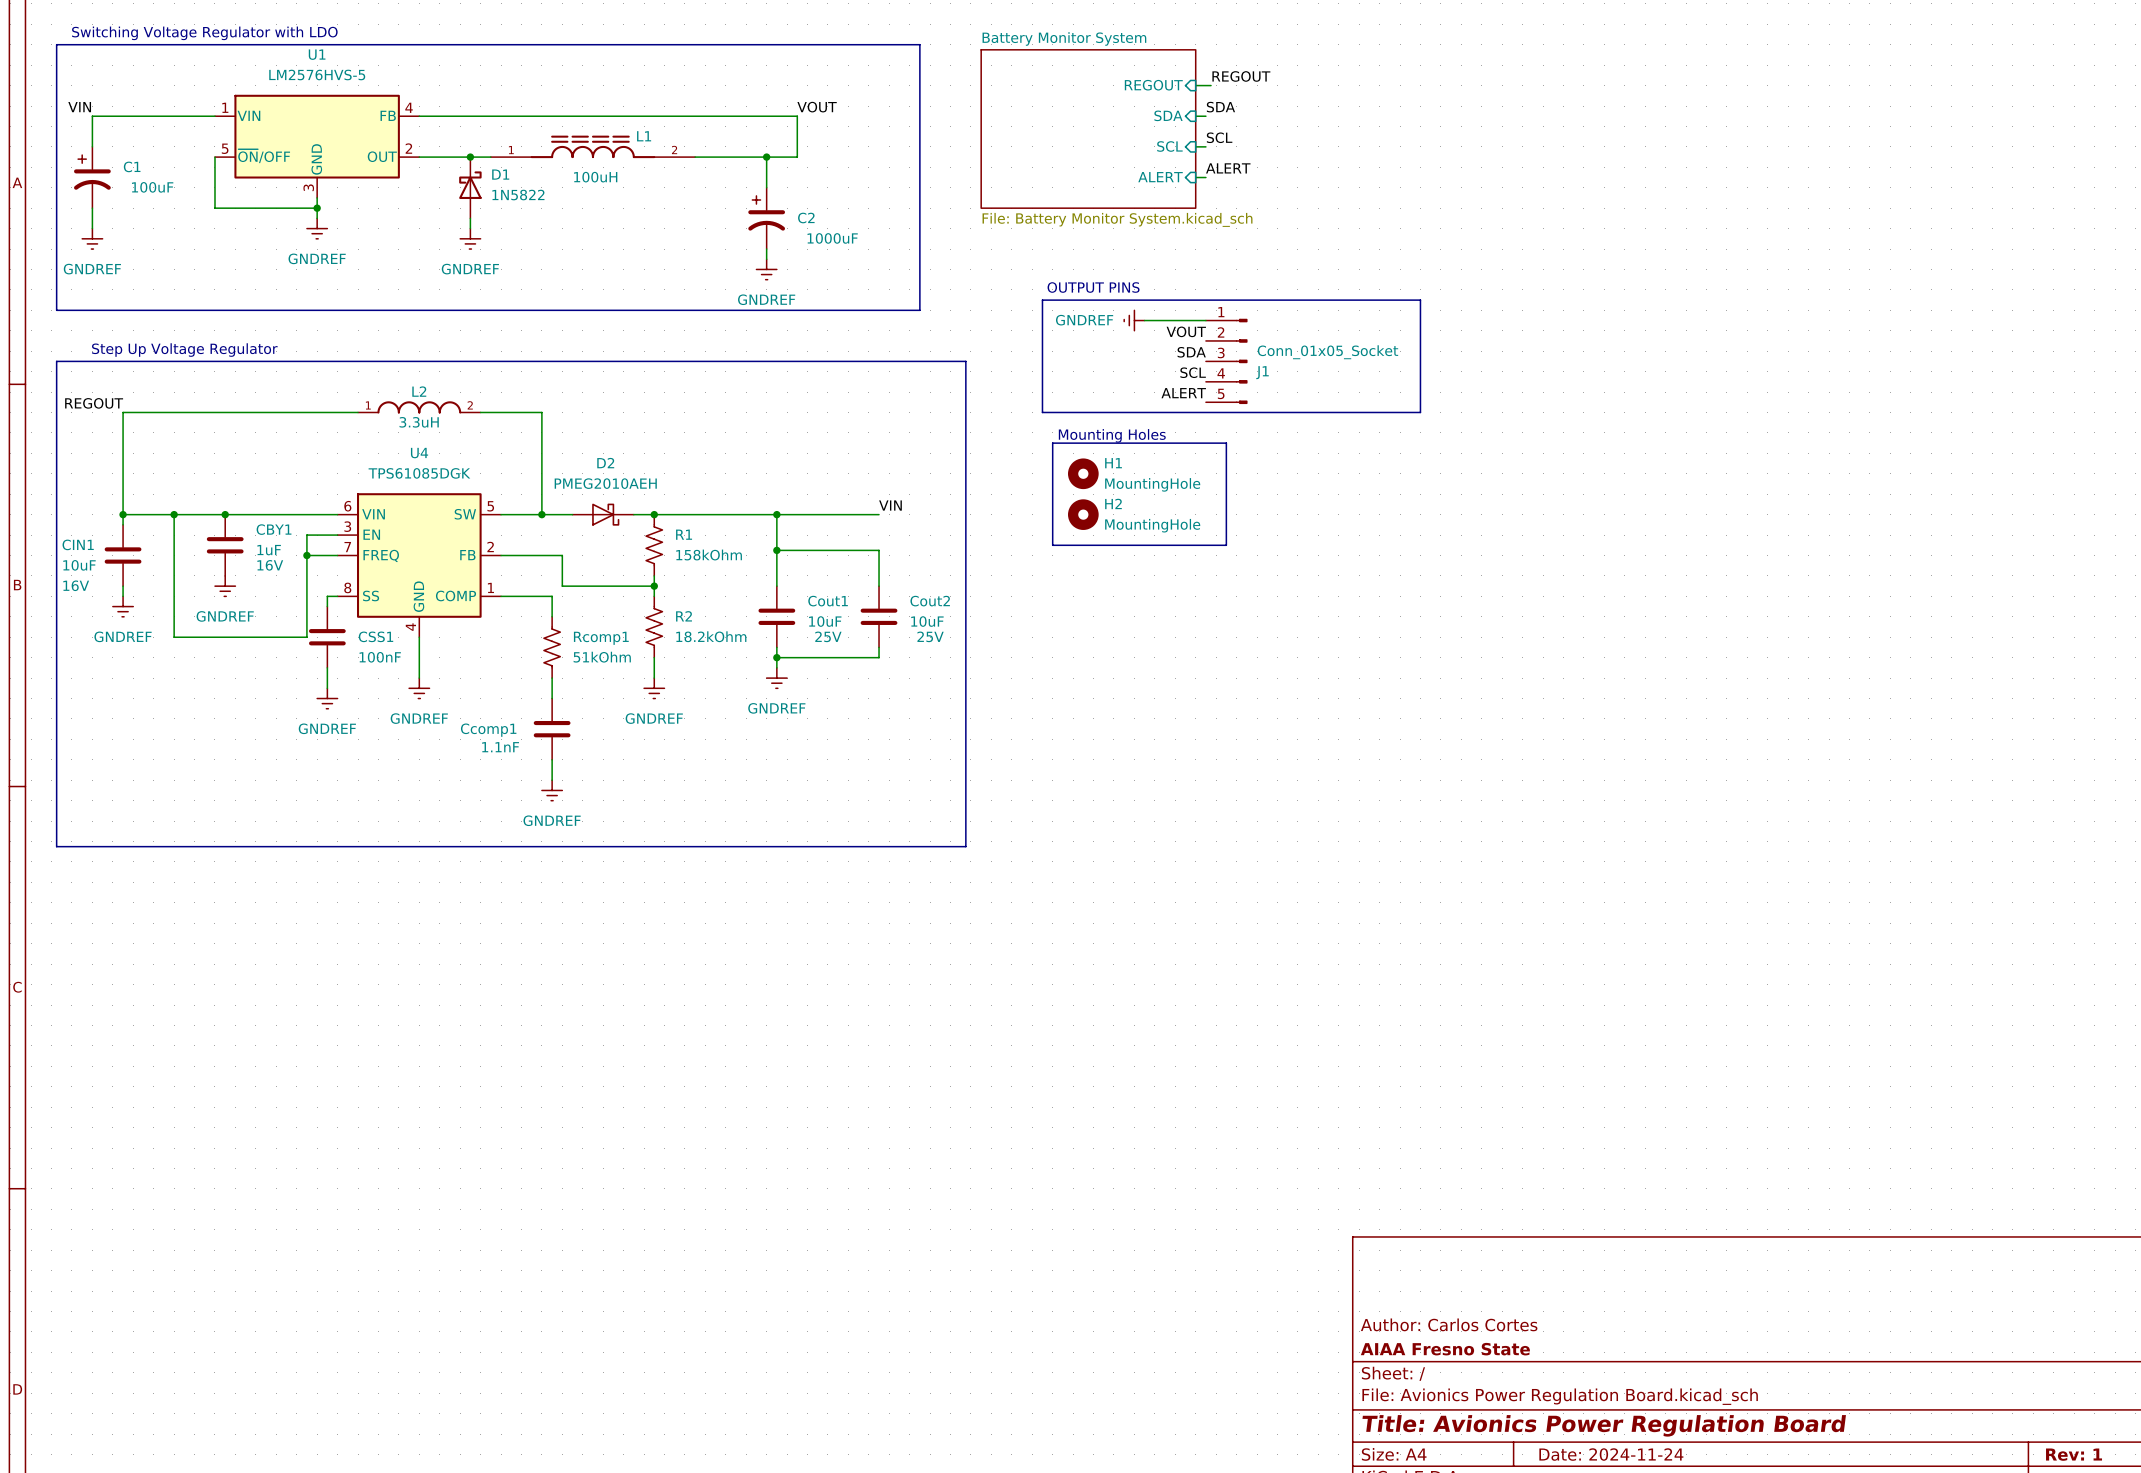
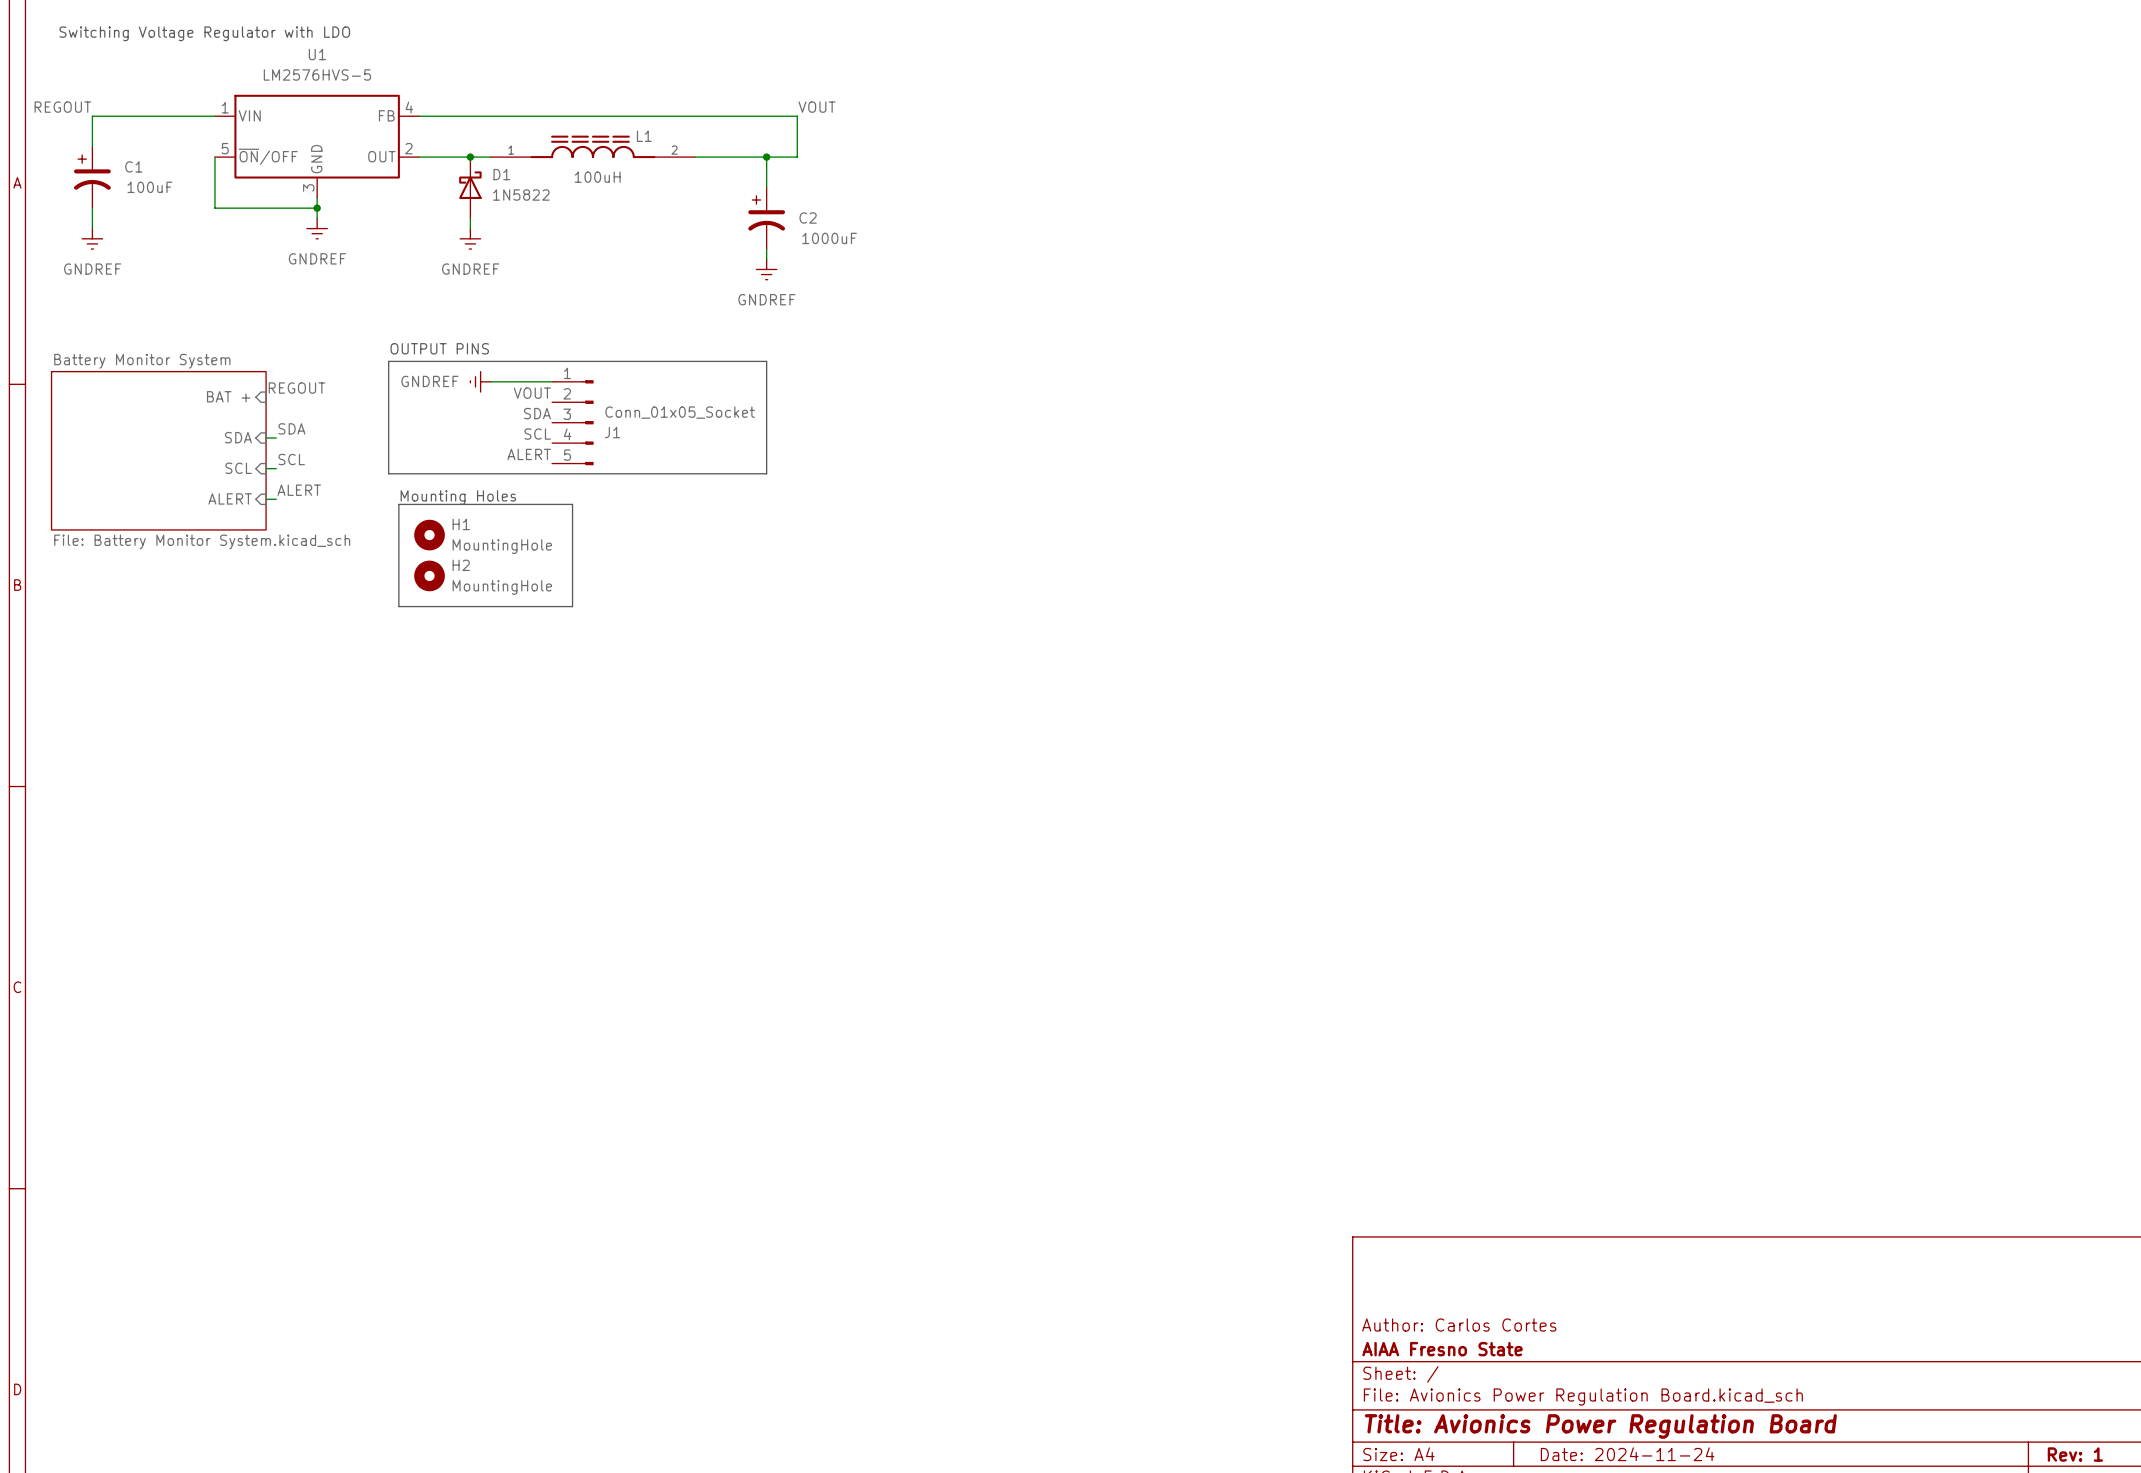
line: (56, 44) (919, 44) (919, 310) (56, 310) (56, 44) -> none
label: REGOUT (1241, 76) -> none
sheet pin: REGOUT (1153, 85) -> none
wire: (1195, 85) (1211, 85) -> none
label: VIN (79, 107) -> REGOUT (62, 107)
label: SDA (1220, 107) -> none
sheet pin: SDA (1168, 115) -> none
wire: (1195, 116) (1205, 116) -> none
sheet Battery Monitor System: File: Battery Monitor System.kicad_sch (1088, 128) -> none
label: SCL (1219, 137) -> none
sheet pin: SCL (1169, 146) -> none
wire: (1195, 146) (1205, 146) -> none
label: ALERT (1228, 168) -> none
sheet pin: ALERT (1160, 177) -> none
wire: (1195, 177) (1205, 177) -> none
text: OUTPUT PINS (1093, 287) -> none
line: (1042, 300) (1420, 300) (1420, 412) (1042, 412) (1042, 300) -> none
power symbol: GNDREF (1134, 320) -> none
wire: (1144, 320) (1205, 320) -> none
label: VOUT (1186, 331) -> none
text: none -> OUTPUT PINS (439, 348)
text: Step Up Voltage Regulator (184, 350) -> none
label: SDA (1191, 352) -> none
line: (388, 361) (56, 361) (56, 846) (965, 846) (965, 361) (766, 361) -> (388, 361) (388, 473) (766, 473) (766, 361)
J1 position: (1226, 361) -> (572, 422)
label: SCL (1193, 372) -> none
power symbol: none -> GNDREF (480, 381)
wire: none -> (490, 381) (552, 381)
label: none -> VOUT (532, 393)
label: ALERT (1183, 393) -> none
sheet pin: none -> BAT + (228, 396)
label position: REGOUT (94, 403) -> REGOUT (297, 388)
L2: 3.3uH (419, 407) -> none
wire: (358, 412) (123, 412) (123, 524) -> none
wire: (480, 412) (541, 412) (541, 514) -> none
label: none -> SDA (537, 413)
label: none -> SDA (291, 428)
label: none -> SCL (537, 434)
text: Mounting Holes (1112, 435) -> none
sheet pin: none -> SDA (238, 437)
wire: none -> (266, 438) (276, 438)
line: (1052, 443) (1226, 443) (1226, 545) (1052, 545) (1052, 443) -> none
sheet Battery Monitor System: none -> File: Battery Monitor System.kicad_sch (158, 450)
label: none -> ALERT (529, 454)
label: none -> SCL (291, 459)
sheet pin: none -> SCL (238, 468)
wire: none -> (266, 468) (276, 468)
H1 position: (1083, 473) -> (429, 535)
label: none -> ALERT (299, 490)
text: none -> Mounting Holes (458, 497)
sheet pin: none -> ALERT (230, 498)
wire: none -> (266, 499) (276, 499)
line: none -> (398, 504) (572, 504) (572, 606) (398, 606) (398, 504)
label: VIN (890, 505) -> none
wire: (123, 514) (337, 514) -> none
junction: (123, 514) -> none
wire: (174, 514) (174, 637) (306, 637) (306, 535) (337, 535) -> none
junction: (174, 514) -> none
junction: (225, 514) -> none
wire: (501, 514) (572, 514) -> none
junction: (541, 514) -> none
D2: PMEG2010AEH (603, 514) -> none
wire: (633, 514) (879, 514) -> none
junction: (654, 514) -> none
wire: (776, 514) (776, 586) -> none
junction: (776, 514) -> none
H2 position: (1083, 514) -> (429, 575)
CBY1: 1uF (225, 545) -> none
R1: 158kOhm (654, 545) -> none
wire: (776, 550) (879, 550) (879, 586) -> none
junction: (776, 550) -> none
CIN1: 10uF (123, 555) -> none
wire: (306, 555) (337, 555) -> none
junction: (306, 555) -> none
wire: (501, 555) (562, 555) (562, 586) (654, 586) -> none
U4: TPS61085DGK (419, 565) -> none
wire: (654, 575) (654, 596) -> none
wire: (123, 586) (123, 596) -> none
power symbol: GNDREF (225, 586) -> none
junction: (654, 586) -> none
wire: (337, 596) (327, 596) (327, 606) -> none
wire: (501, 596) (552, 596) (552, 616) -> none
power symbol: GNDREF (123, 606) -> none
Cout1: 10uF (776, 616) -> none
Cout2: 10uF (879, 616) -> none
R2: 18.2kOhm (654, 627) -> none
CSS1: 100nF (327, 637) -> none
wire: (419, 637) (419, 678) -> none
Rcomp1: 51kOhm (552, 647) -> none
wire: (776, 647) (776, 667) -> none
wire: (879, 647) (879, 657) (776, 657) -> none
wire: (654, 657) (654, 678) -> none
junction: (776, 657) -> none
wire: (327, 667) (327, 688) -> none
wire: (552, 678) (552, 698) -> none
power symbol: GNDREF (776, 678) -> none
power symbol: GNDREF (419, 688) -> none
power symbol: GNDREF (654, 688) -> none
power symbol: GNDREF (327, 698) -> none
Ccomp1: 1.1nF (552, 729) -> none
wire: (552, 759) (552, 780) -> none
power symbol: GNDREF (552, 790) -> none

